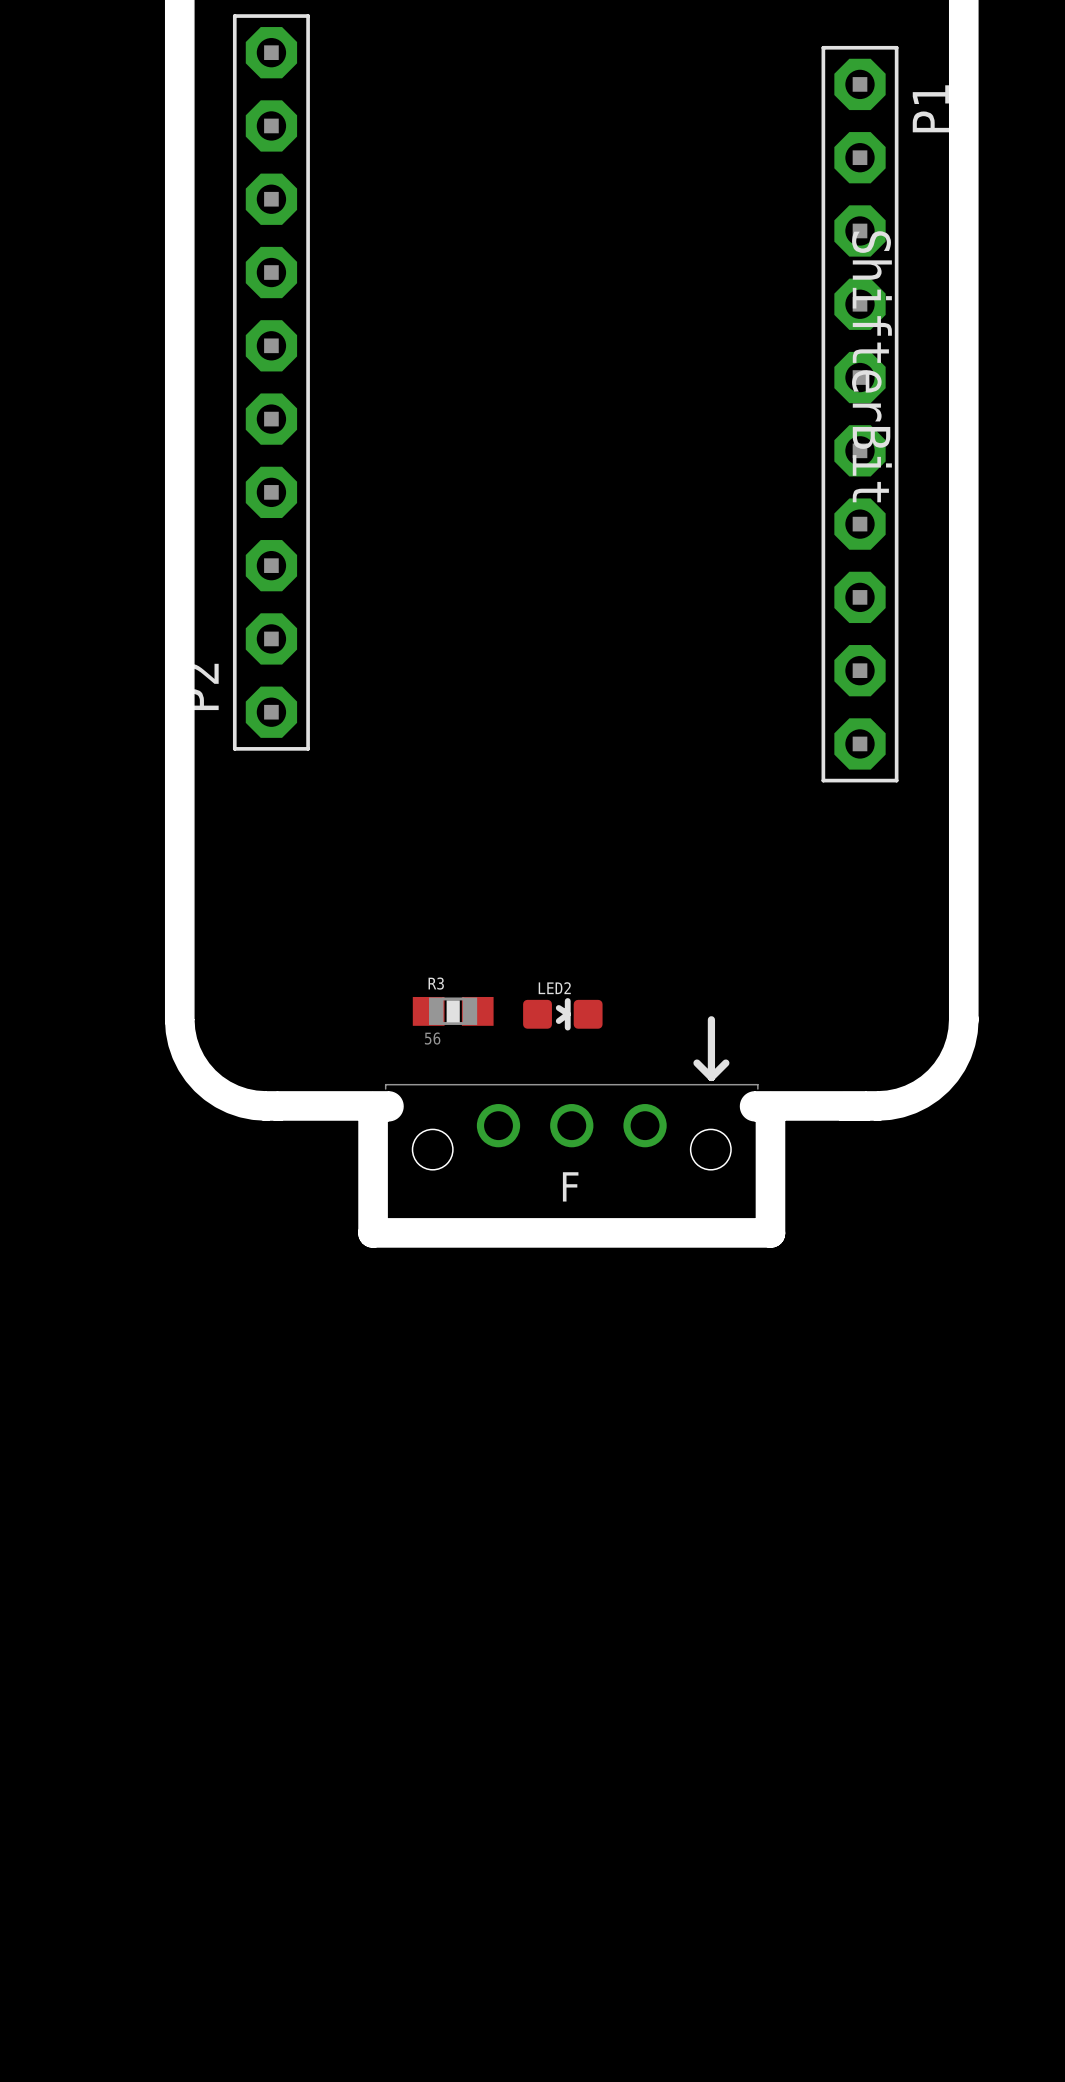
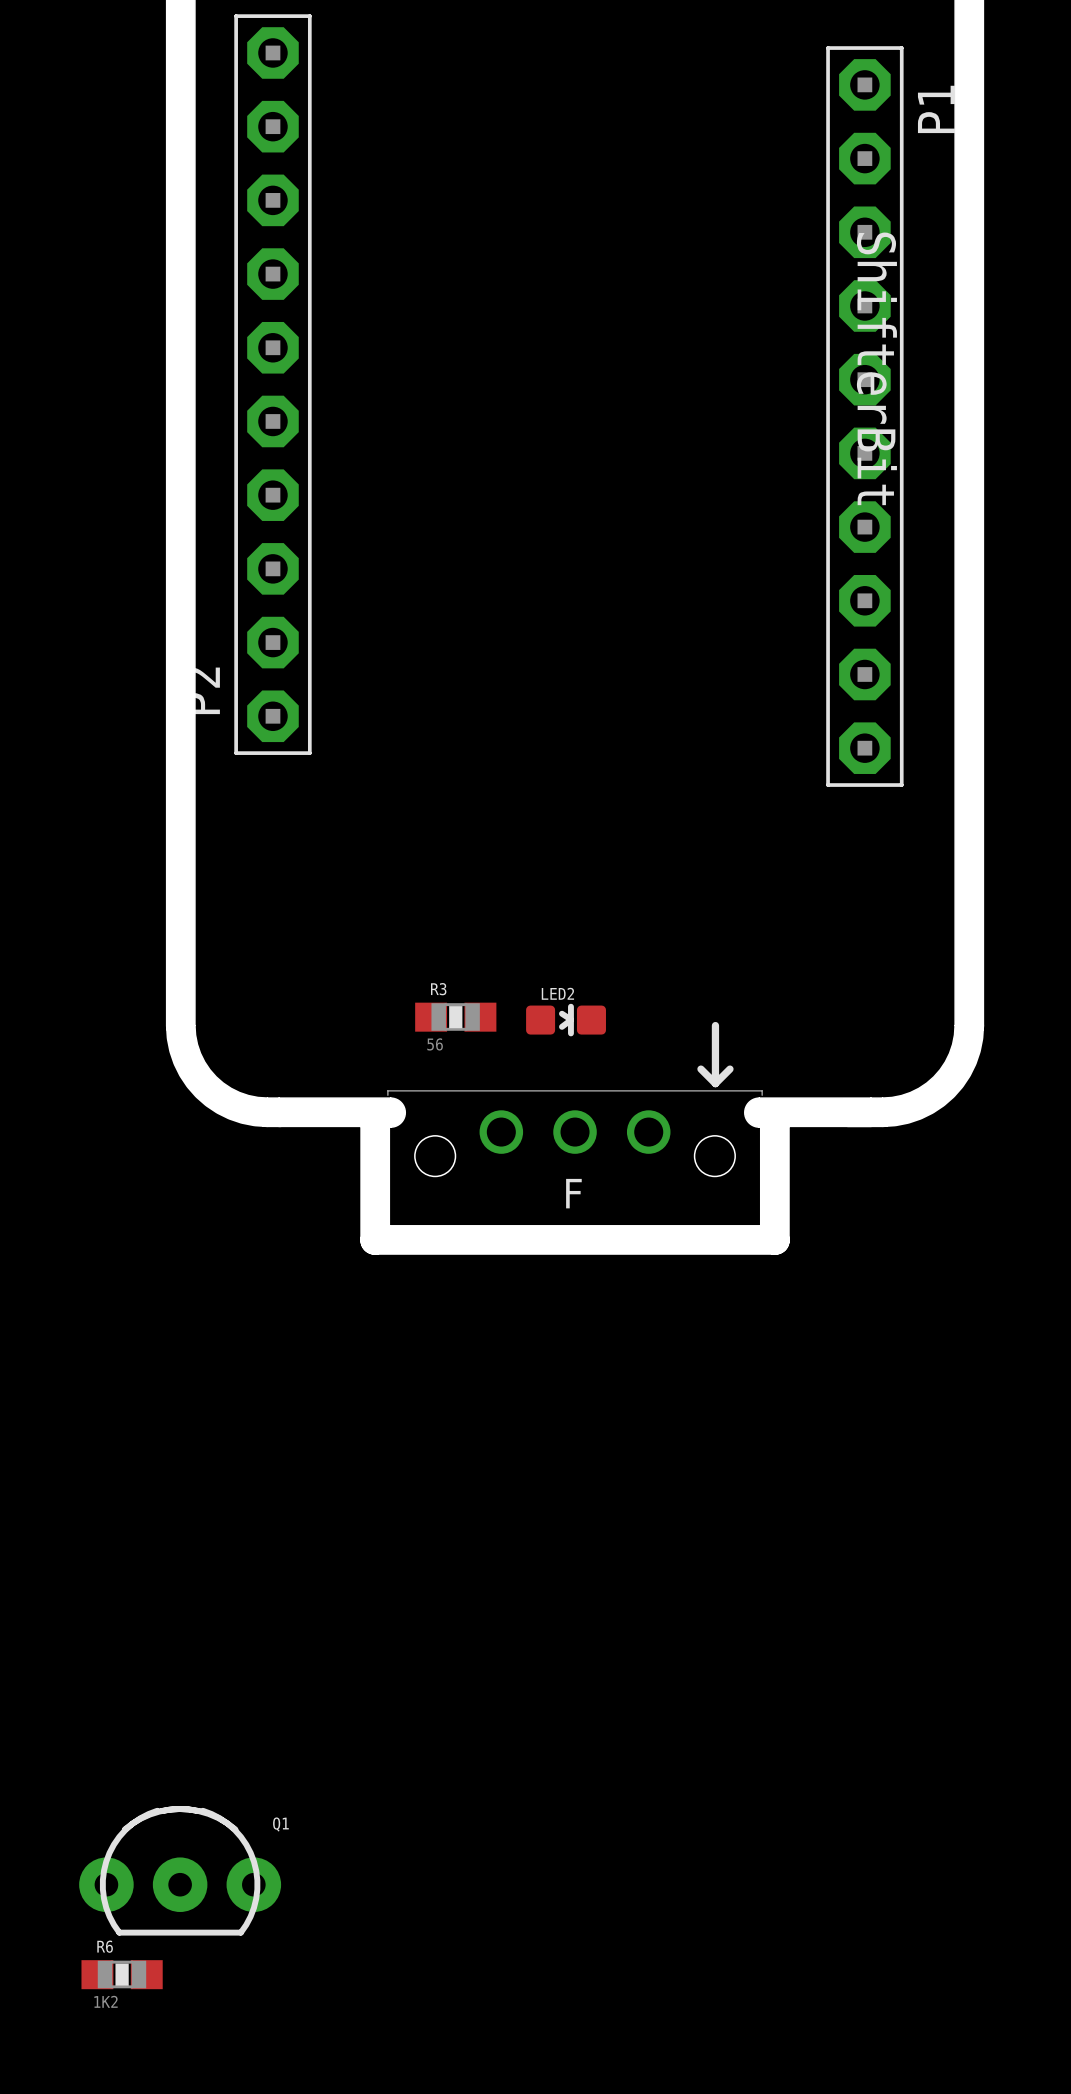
Q1: none -> (180, 1870)
R6: none -> 1K2 (122, 1974)

